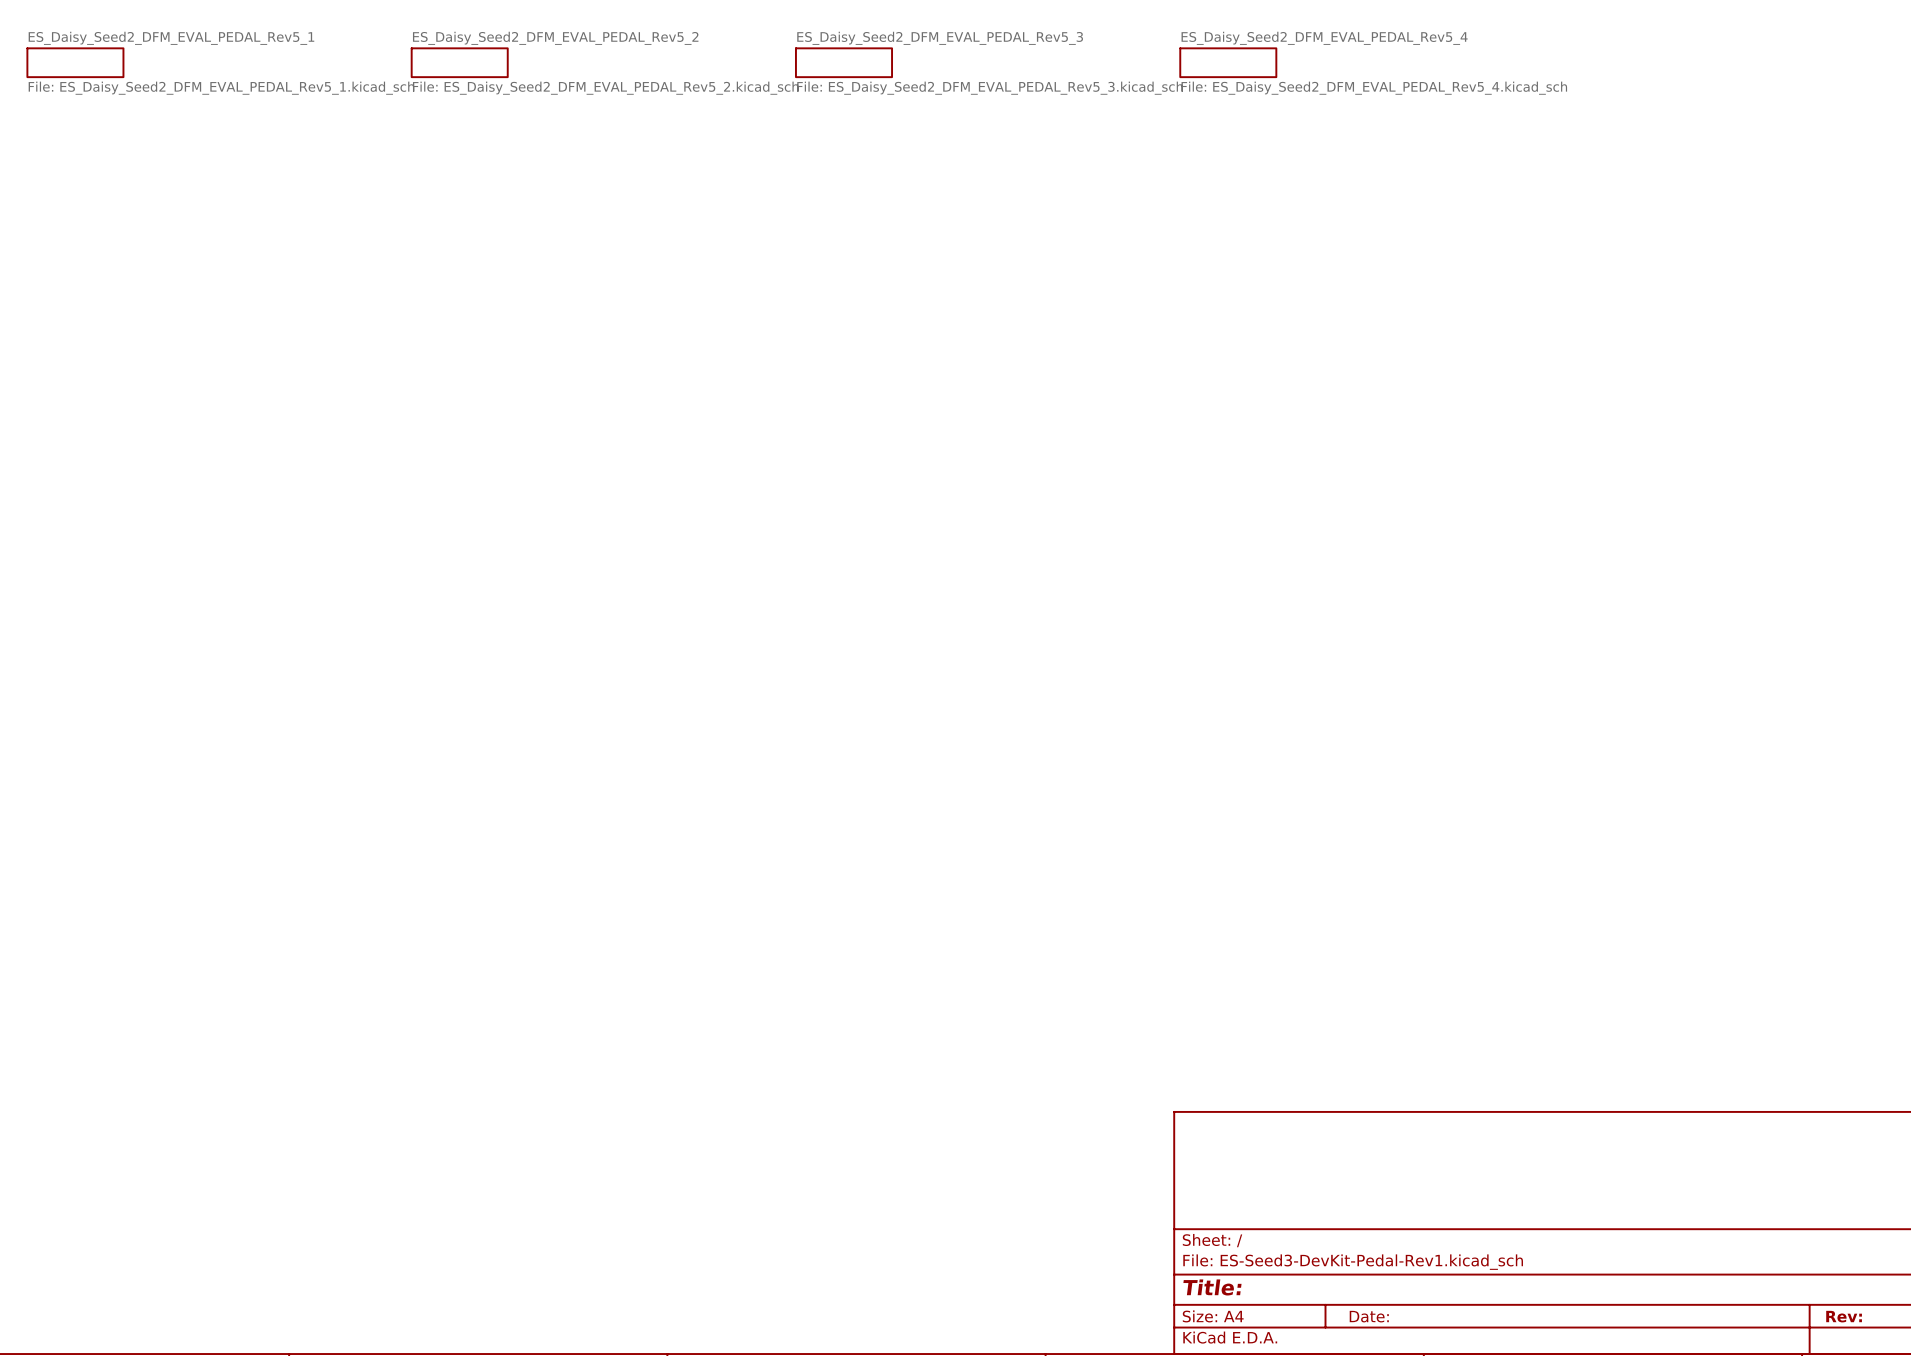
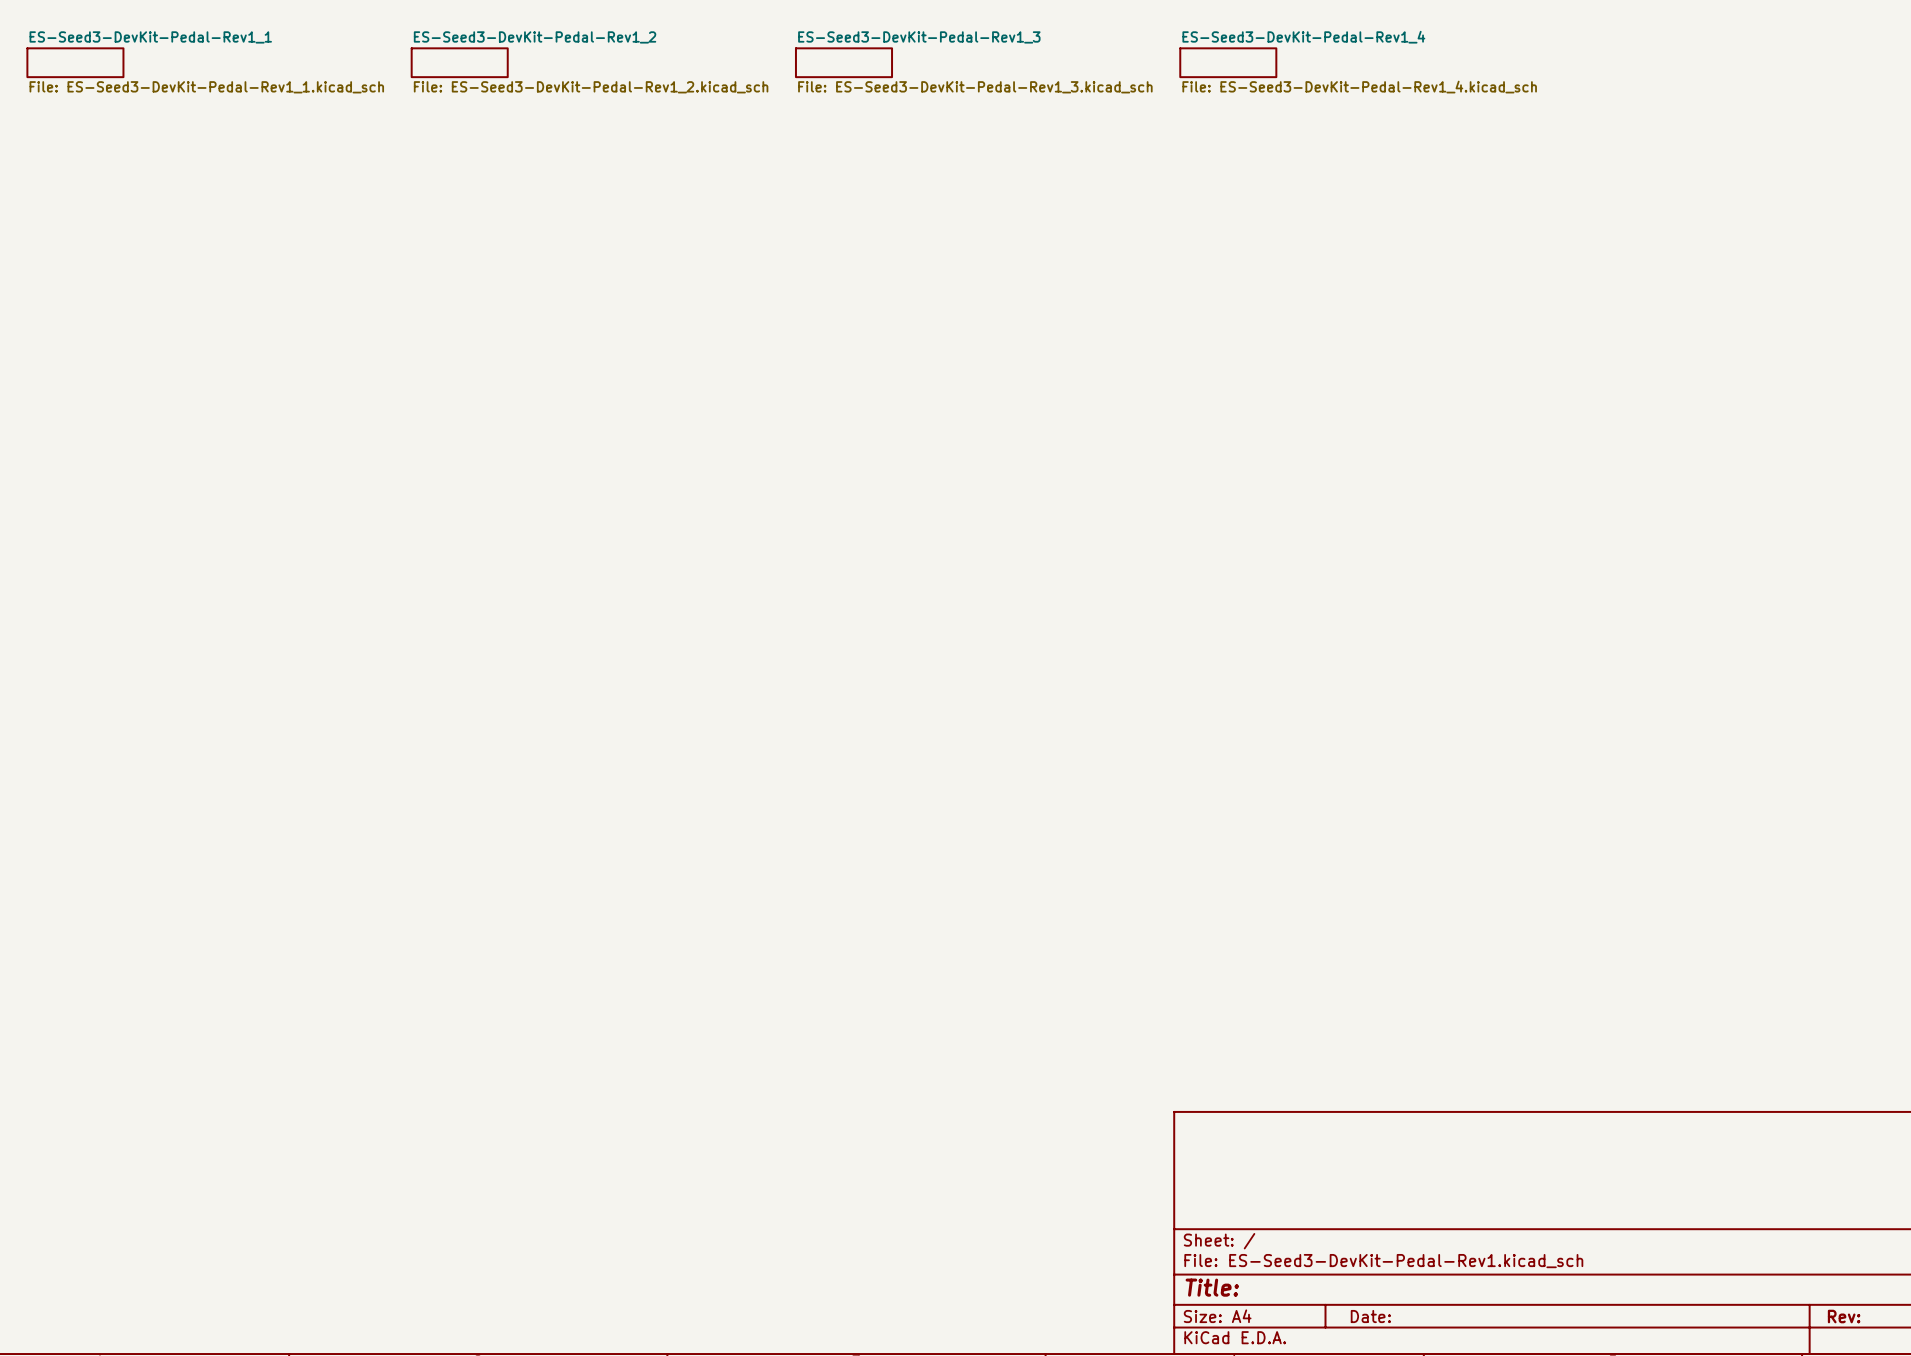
sheet ES_Daisy_Seed2_DFM_EVAL_PEDAL_Rev5_1 name: ES_Daisy_Seed2_DFM_EVAL_PEDAL_Rev5_1 (171, 38) -> ES-Seed3-DevKit-Pedal-Rev1_1 (150, 37)
sheet ES_Daisy_Seed2_DFM_EVAL_PEDAL_Rev5_2 name: ES_Daisy_Seed2_DFM_EVAL_PEDAL_Rev5_2 (555, 38) -> ES-Seed3-DevKit-Pedal-Rev1_2 (535, 37)
sheet ES_Daisy_Seed2_DFM_EVAL_PEDAL_Rev5_3 name: ES_Daisy_Seed2_DFM_EVAL_PEDAL_Rev5_3 (940, 38) -> ES-Seed3-DevKit-Pedal-Rev1_3 (919, 37)
sheet ES_Daisy_Seed2_DFM_EVAL_PEDAL_Rev5_4 name: ES_Daisy_Seed2_DFM_EVAL_PEDAL_Rev5_4 (1324, 38) -> ES-Seed3-DevKit-Pedal-Rev1_4 (1303, 37)
sheet ES_Daisy_Seed2_DFM_EVAL_PEDAL_Rev5_1 value: File: ES_Daisy_Seed2_DFM_EVAL_PEDAL_Rev5_1.kicad_sch (221, 88) -> File: ES-Seed3-DevKit-Pedal-Rev1_1.kicad_sch (206, 87)
sheet ES_Daisy_Seed2_DFM_EVAL_PEDAL_Rev5_2 value: File: ES_Daisy_Seed2_DFM_EVAL_PEDAL_Rev5_2.kicad_sch (605, 88) -> File: ES-Seed3-DevKit-Pedal-Rev1_2.kicad_sch (591, 87)
sheet ES_Daisy_Seed2_DFM_EVAL_PEDAL_Rev5_3 value: File: ES_Daisy_Seed2_DFM_EVAL_PEDAL_Rev5_3.kicad_sch (990, 88) -> File: ES-Seed3-DevKit-Pedal-Rev1_3.kicad_sch (975, 87)
sheet ES_Daisy_Seed2_DFM_EVAL_PEDAL_Rev5_4 value: File: ES_Daisy_Seed2_DFM_EVAL_PEDAL_Rev5_4.kicad_sch (1374, 88) -> File: ES-Seed3-DevKit-Pedal-Rev1_4.kicad_sch (1359, 87)

